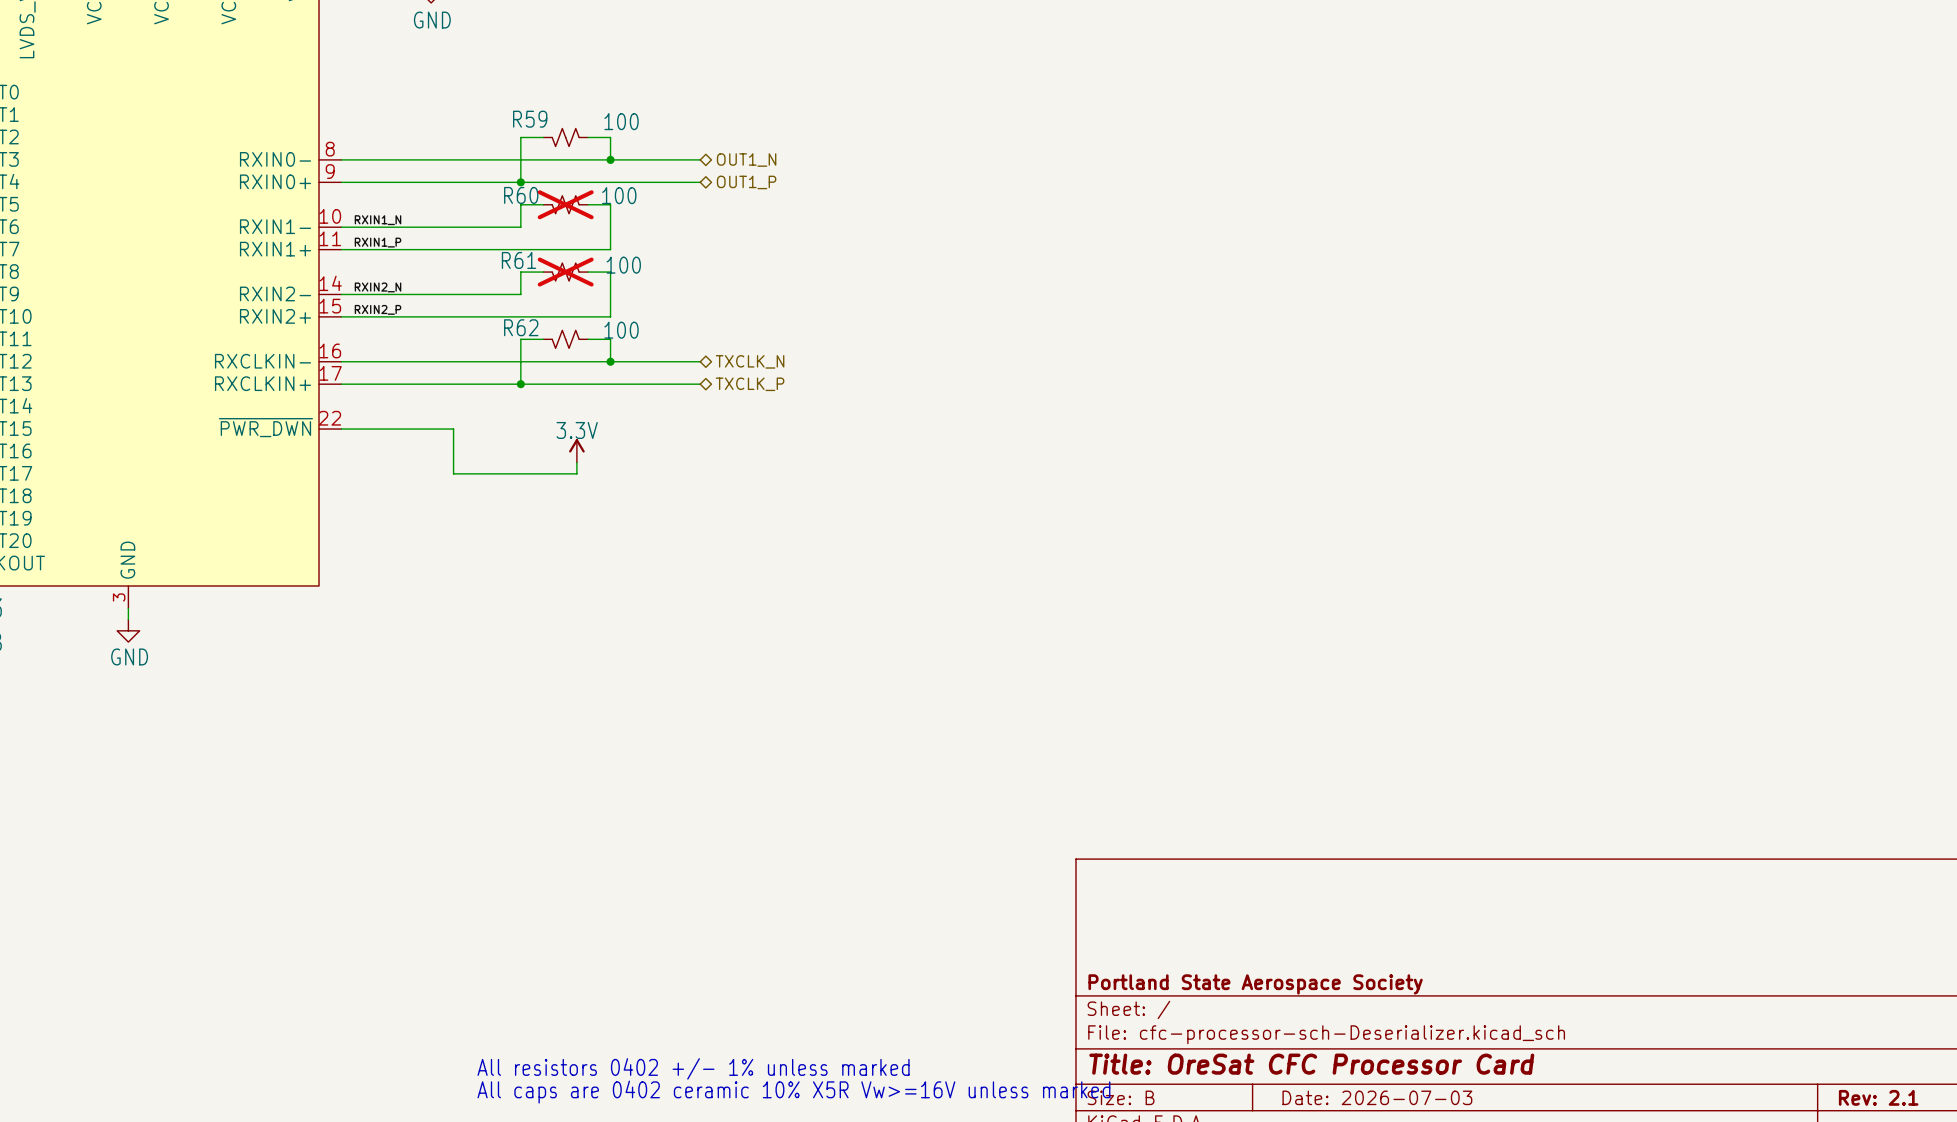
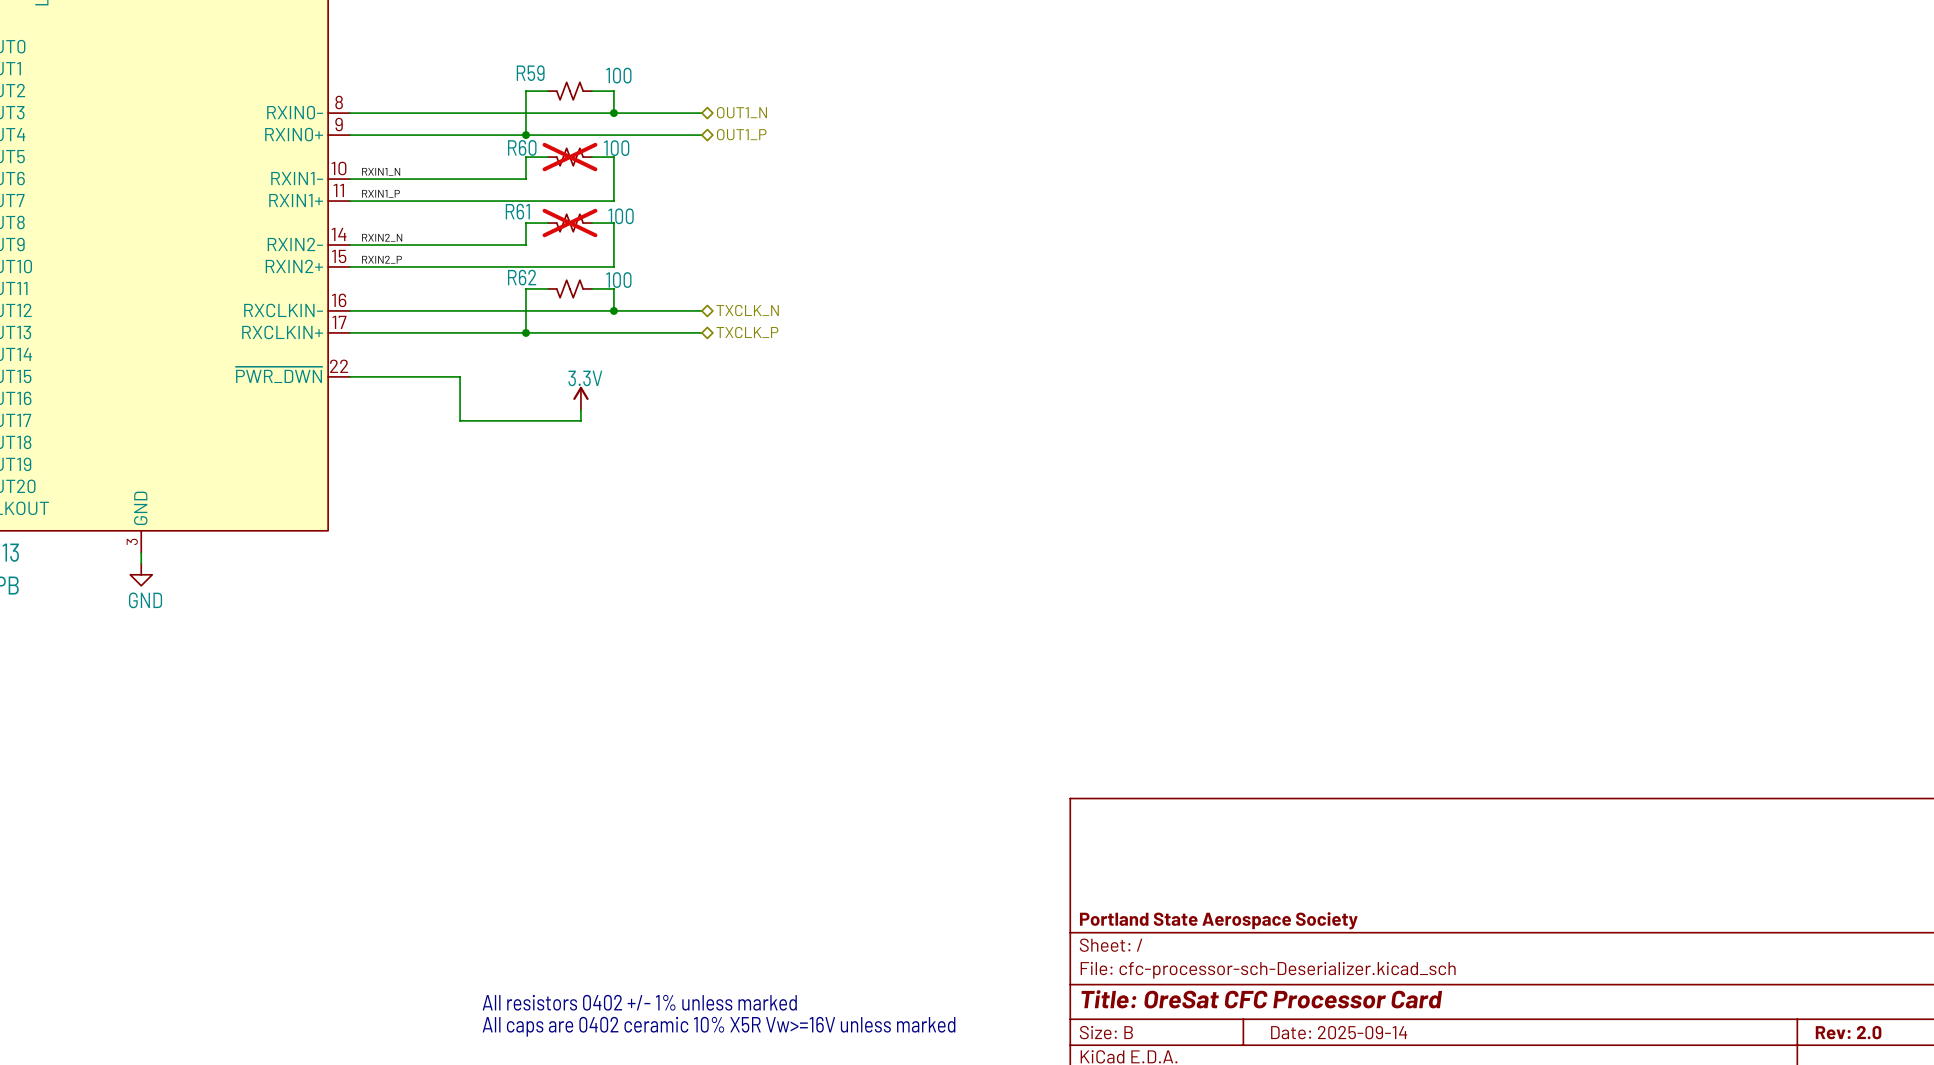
title block: Date: 2026-07-03 (1377, 1097) -> Date: 2025-09-14 (1339, 1032)
title block: Rev: 2.1 (1878, 1097) -> Rev: 2.0 (1848, 1032)

